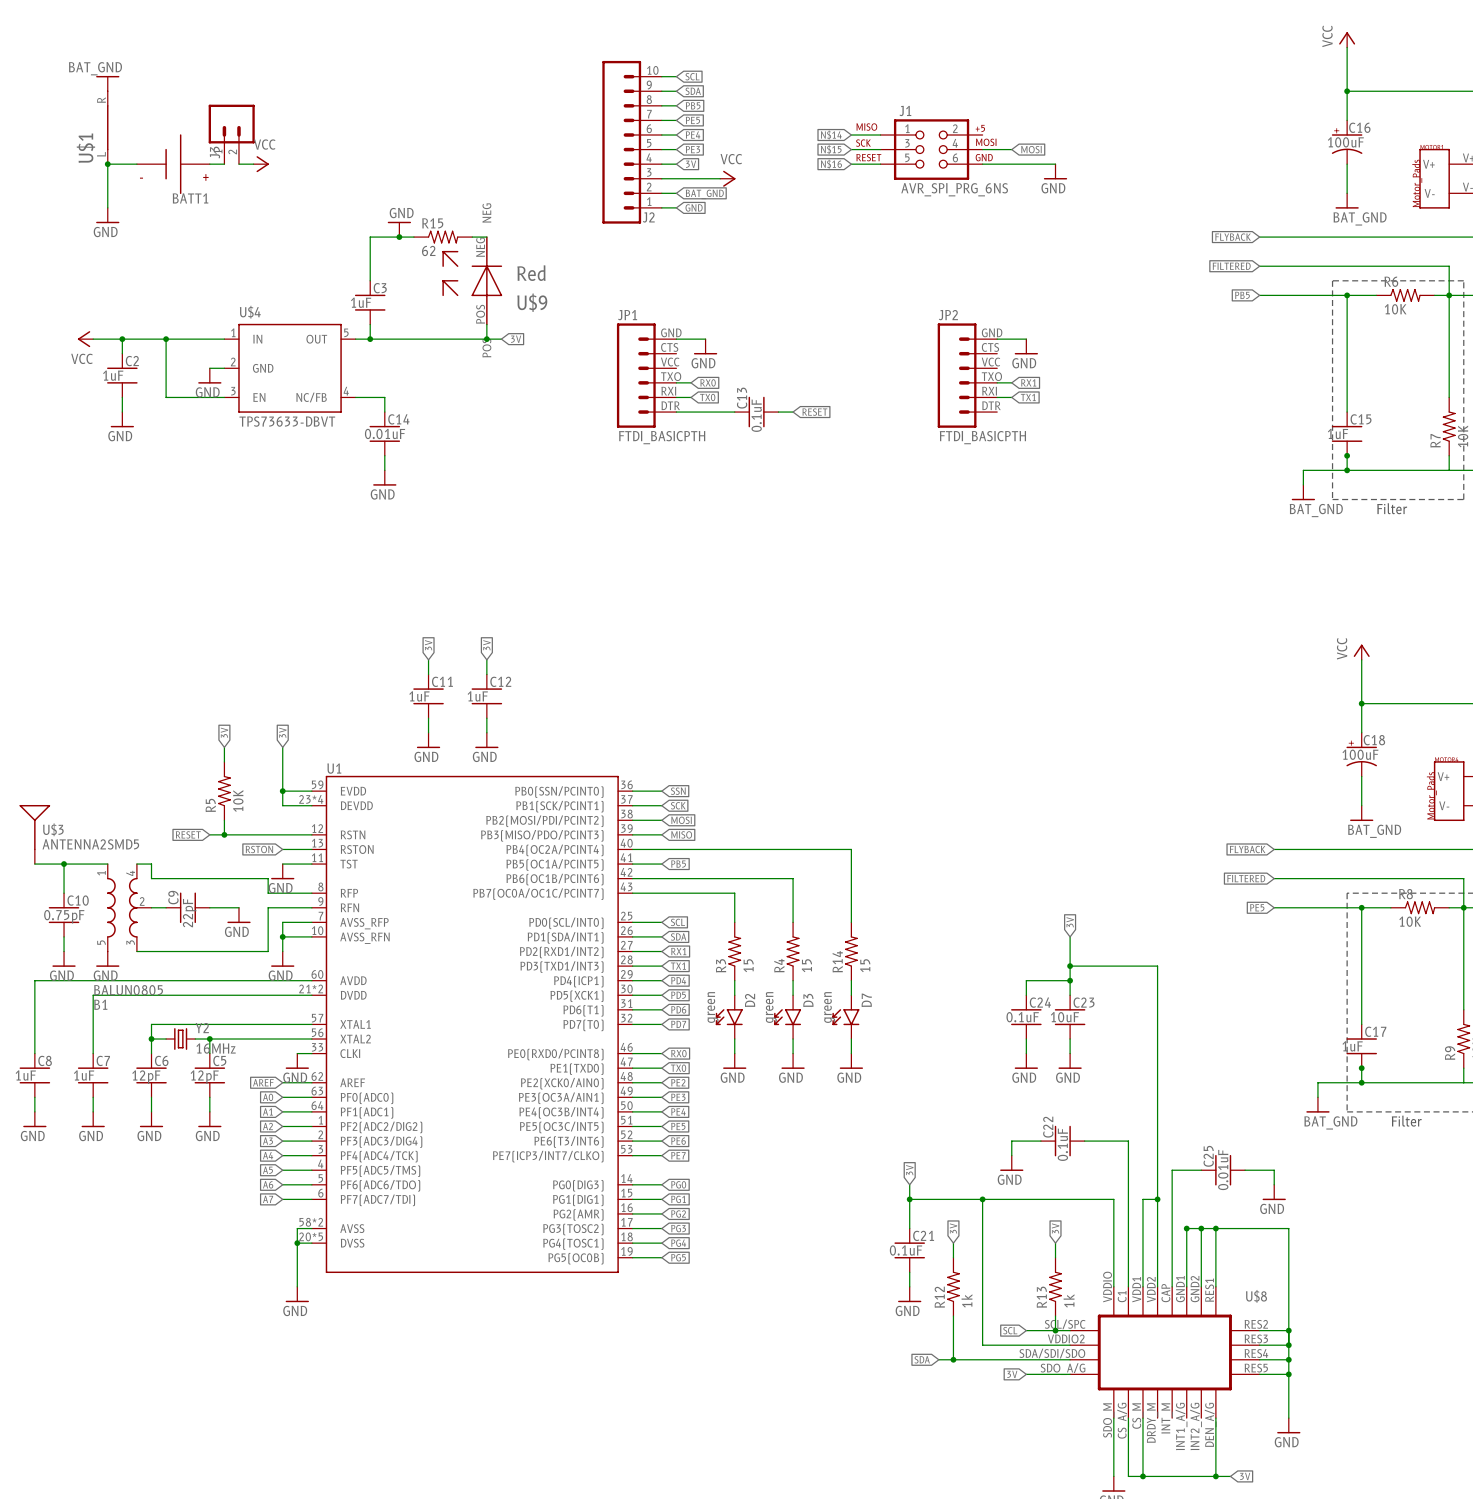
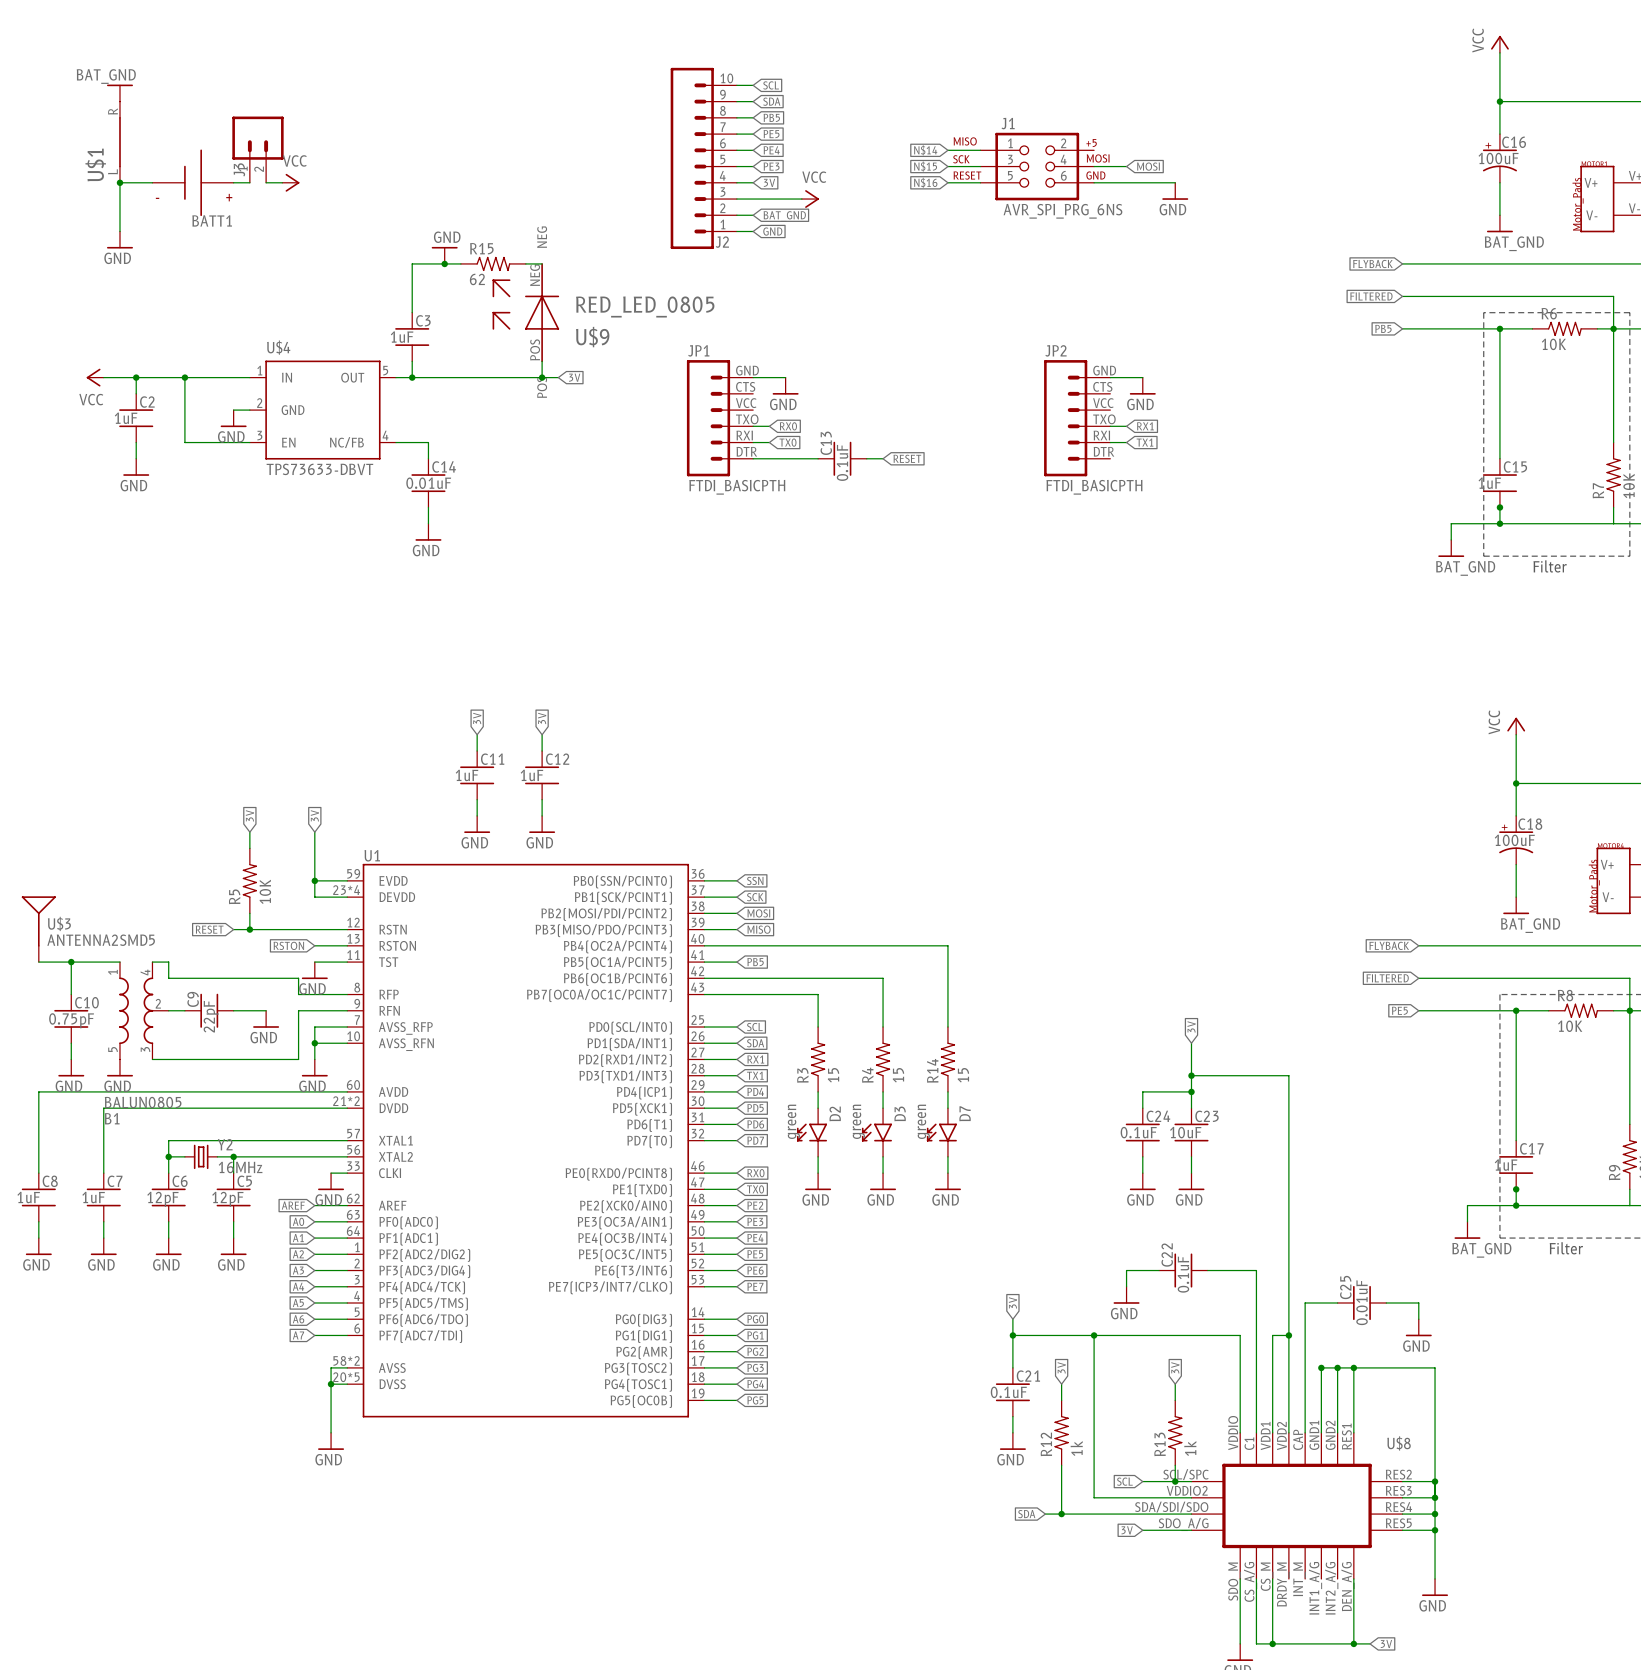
U$9 value: Red (531, 273) -> RED_LED_0805 (645, 306)

